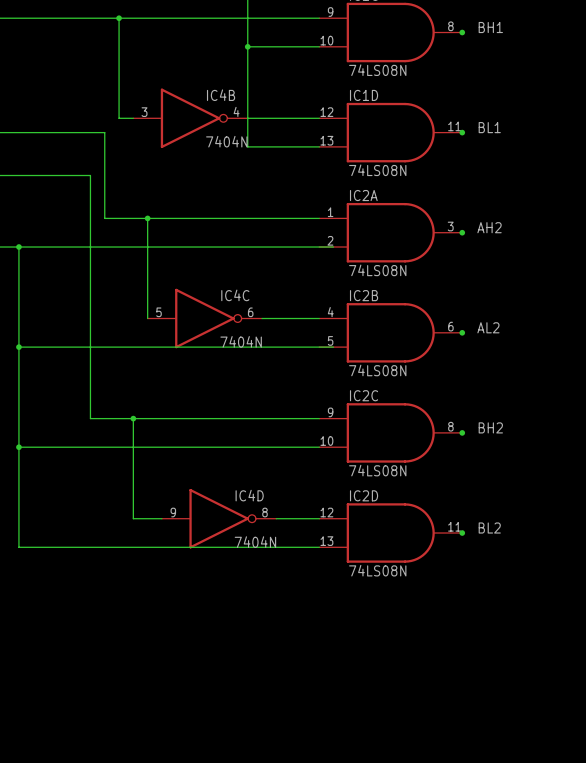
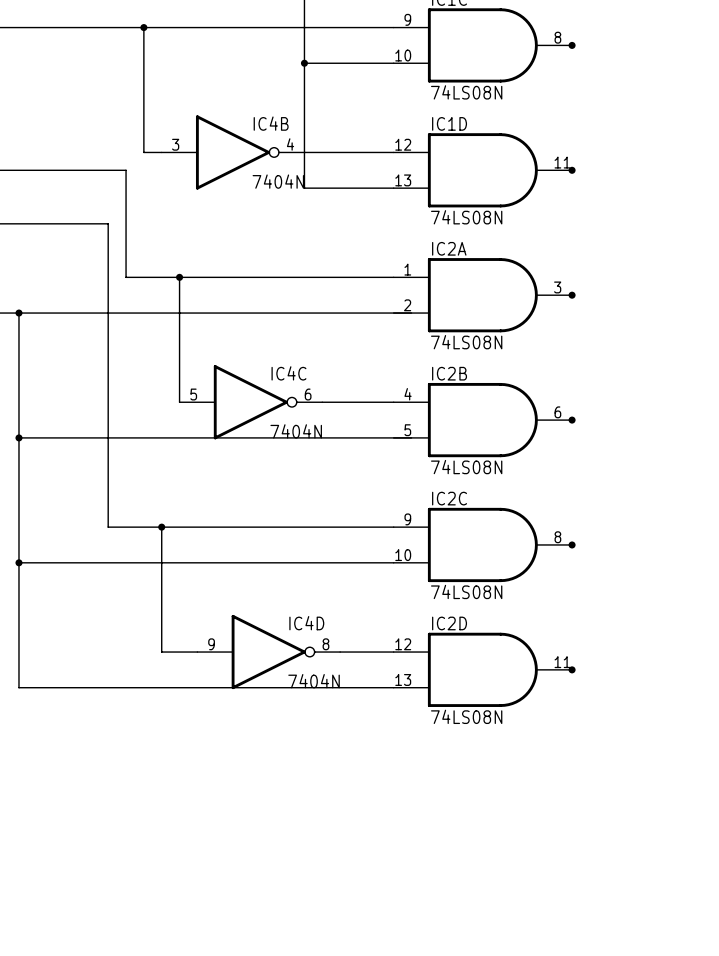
label: BH1 (490, 27) -> none
label: BL1 (489, 127) -> none
label: AH2 (489, 227) -> none
label: AL2 (488, 327) -> none
label: BH2 (490, 427) -> none
label: BL2 (489, 528) -> none

